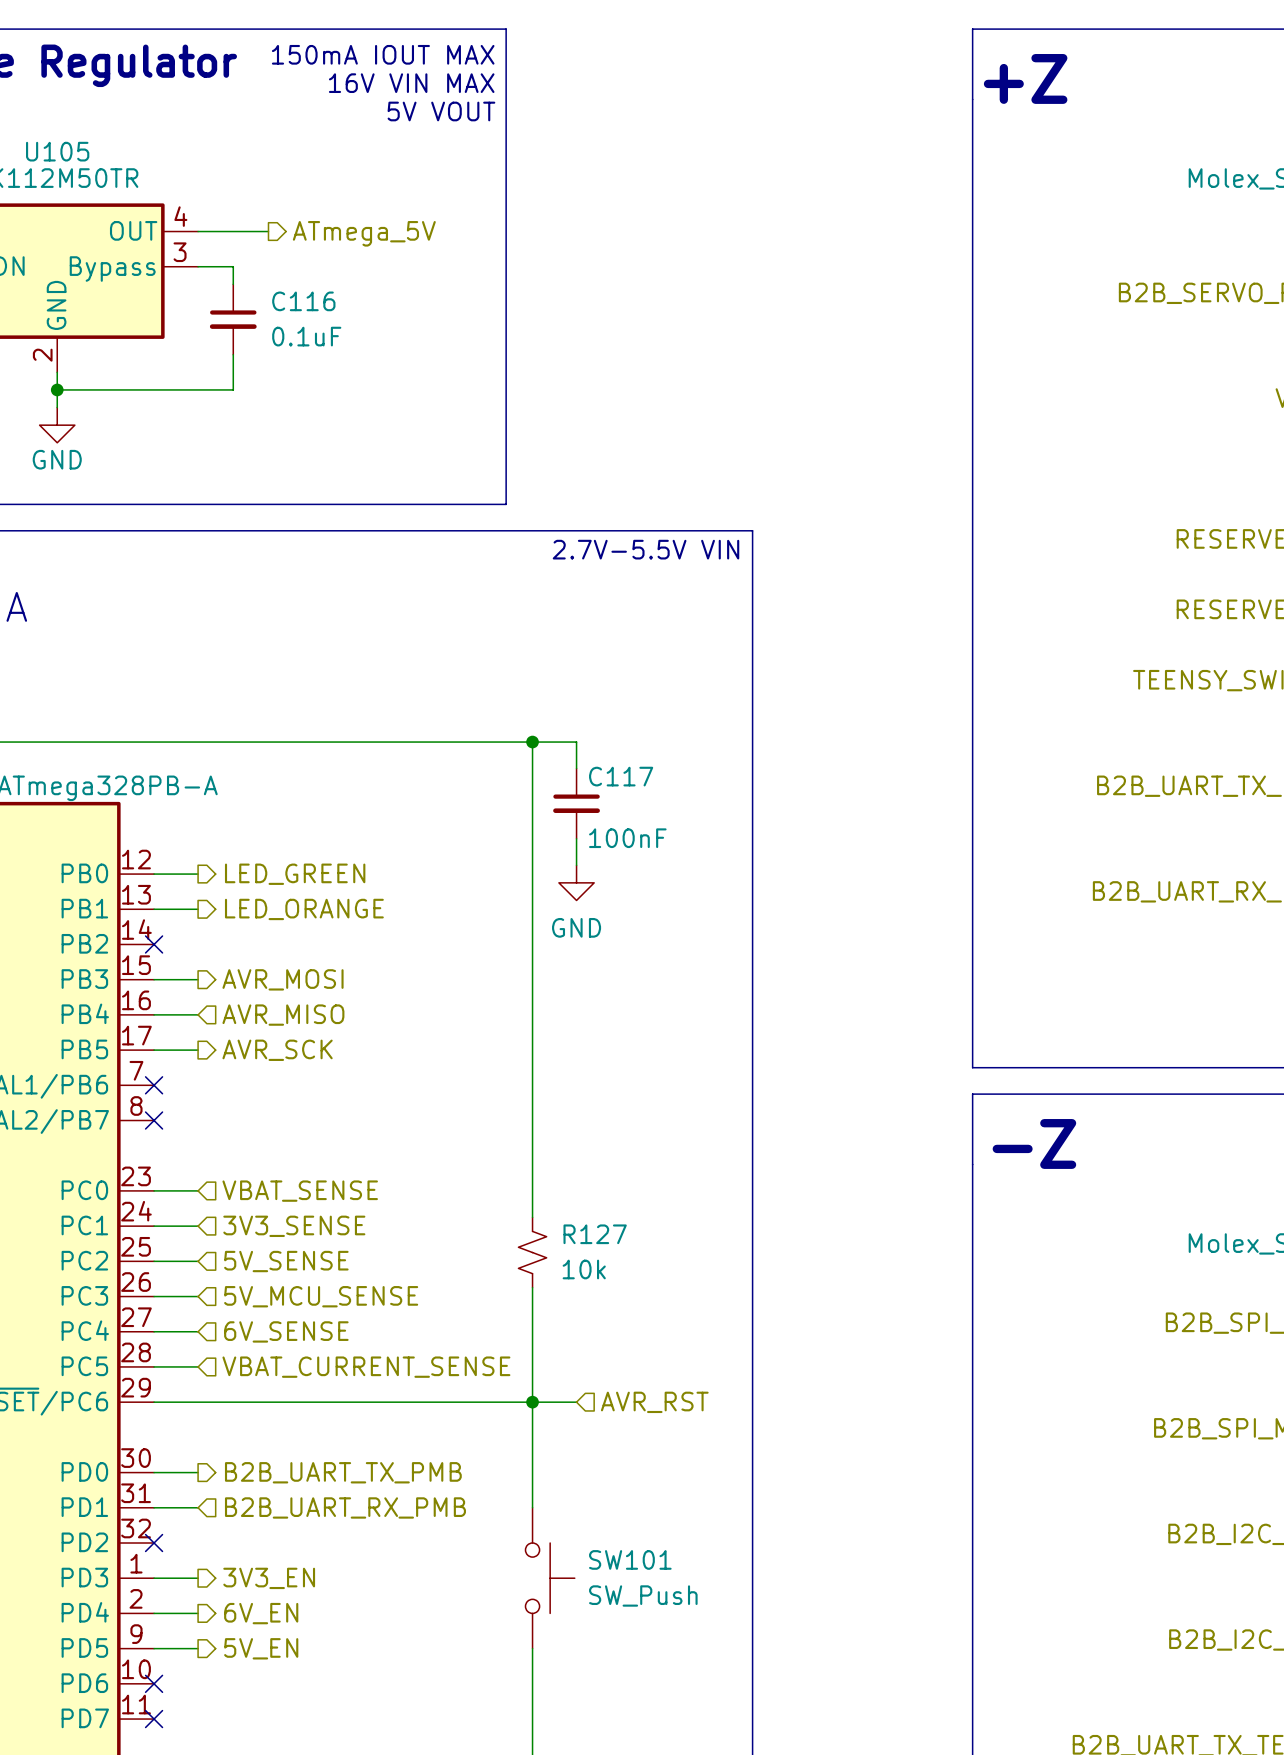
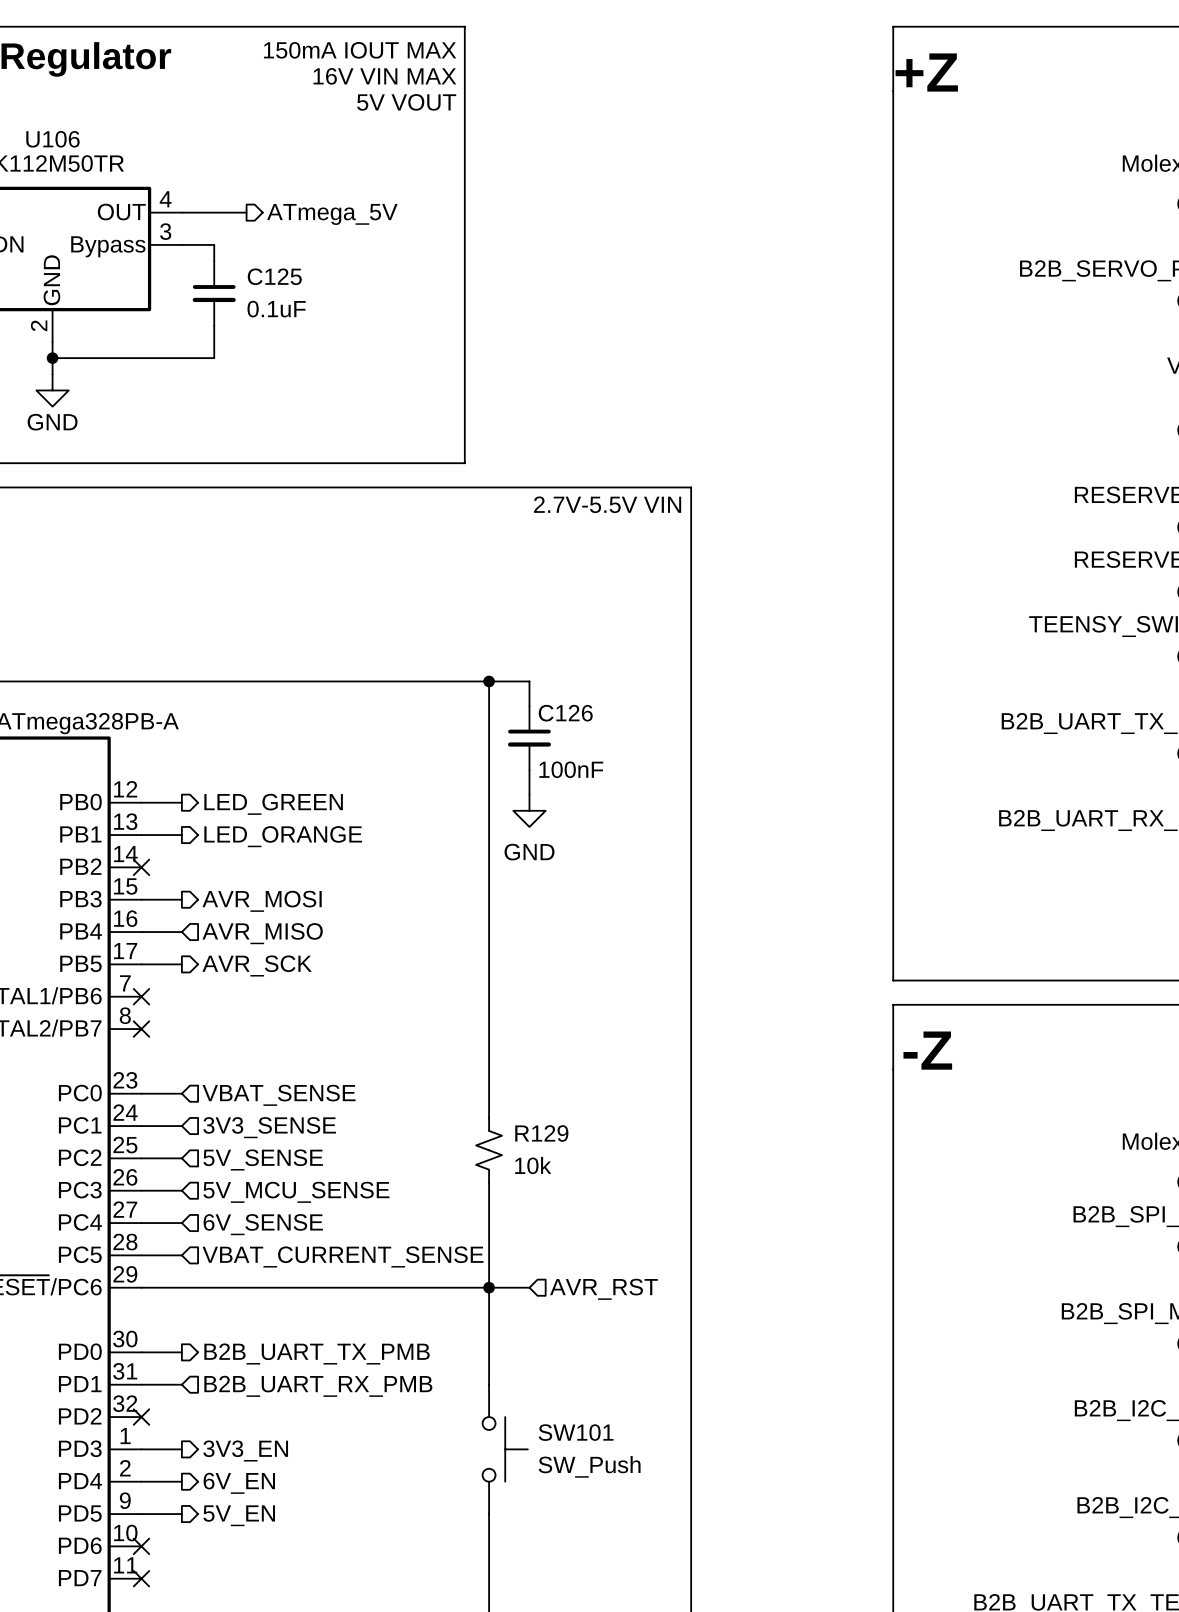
U105 name: U105 (57, 151) -> U106 (52, 139)
C116 name: C116 (303, 301) -> C125 (274, 276)
C117 name: C117 (621, 776) -> C126 (565, 713)
R127 name: R127 (595, 1234) -> R129 (541, 1133)

